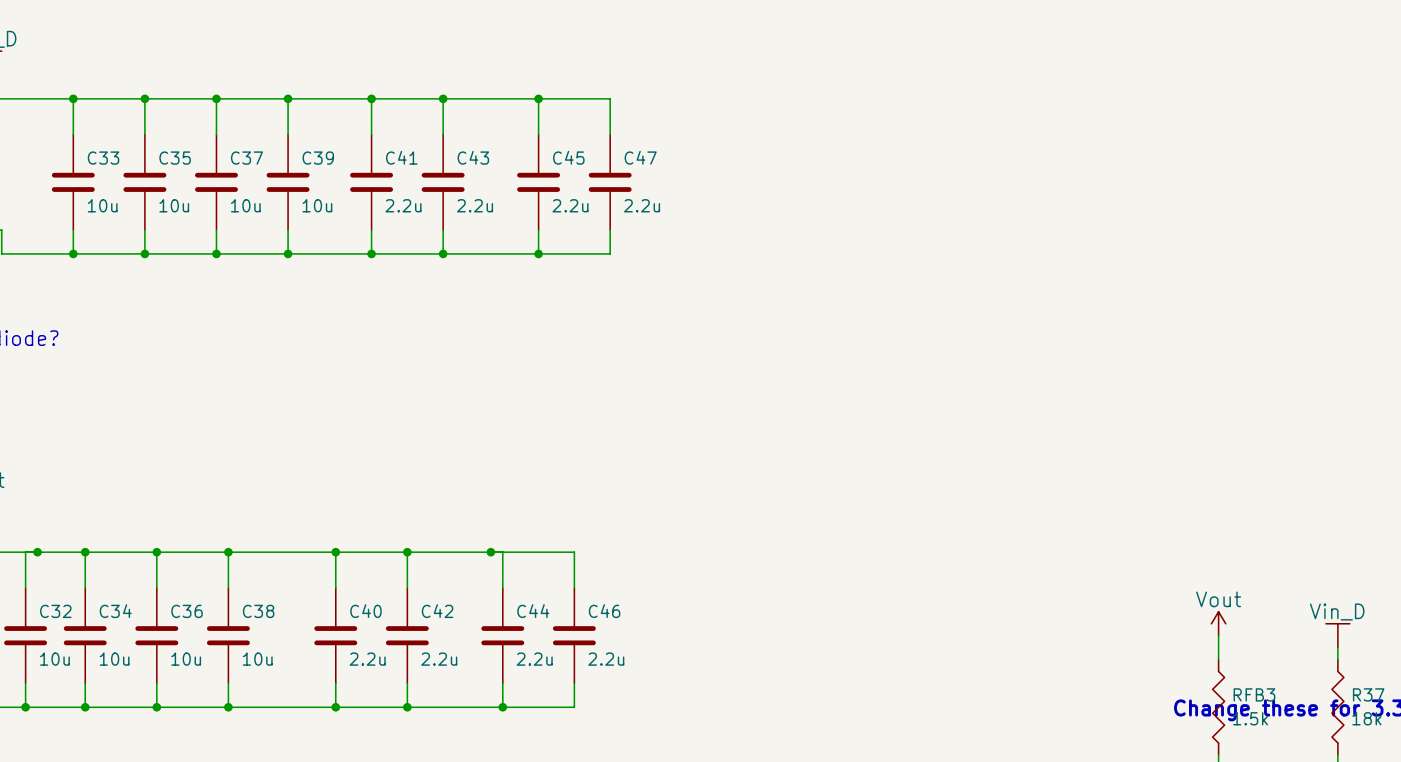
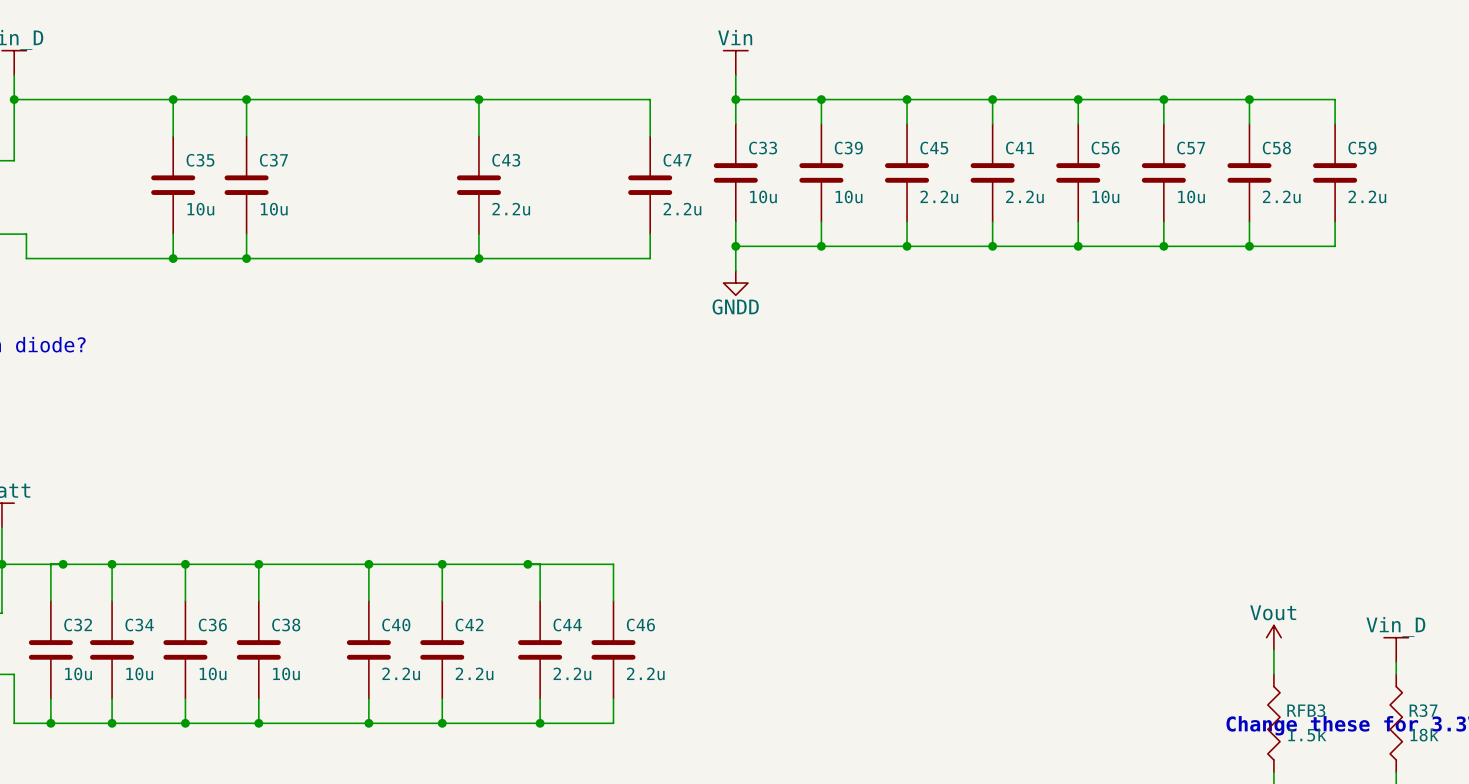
power symbol: none -> Vin (735, 62)
wire: none -> (735, 75) (735, 124)
wire: (73, 98) (73, 134) -> none
junction: (73, 98) -> none
wire: (288, 98) (288, 134) -> none
junction: (288, 98) -> none
wire: (371, 98) (371, 134) -> none
junction: (371, 98) -> none
wire: (538, 98) (538, 134) -> none
junction: (538, 98) -> none
wire: none -> (735, 99) (1335, 99) (1335, 124)
junction: none -> (735, 99)
wire: none -> (821, 99) (821, 124)
junction: none -> (821, 99)
wire: none -> (907, 99) (907, 124)
junction: none -> (907, 99)
wire: none -> (992, 99) (992, 124)
junction: none -> (992, 99)
wire: none -> (1078, 99) (1078, 124)
junction: none -> (1078, 99)
wire: none -> (1163, 99) (1163, 124)
junction: none -> (1163, 99)
wire: none -> (1249, 99) (1249, 124)
junction: none -> (1249, 99)
C56: none -> 10u (1078, 172)
C57: none -> 10u (1163, 172)
C58: none -> 2.2u (1249, 172)
C59: none -> 2.2u (1335, 172)
C33 position: (73, 182) -> (735, 172)
C39 position: (288, 182) -> (821, 172)
C41 position: (371, 182) -> (992, 172)
C45 position: (538, 182) -> (907, 172)
wire: none -> (735, 221) (735, 270)
wire: none -> (821, 221) (821, 246)
wire: none -> (907, 221) (907, 246)
wire: none -> (992, 221) (992, 246)
wire: none -> (1078, 221) (1078, 246)
wire: none -> (1163, 221) (1163, 246)
wire: none -> (1249, 221) (1249, 246)
wire: none -> (1335, 221) (1335, 246) (735, 246)
wire: (73, 230) (73, 253) -> none
wire: (288, 230) (288, 253) -> none
wire: (371, 230) (371, 253) -> none
wire: (538, 230) (538, 253) -> none
junction: none -> (735, 246)
junction: none -> (821, 246)
junction: none -> (907, 246)
junction: none -> (992, 246)
junction: none -> (1078, 246)
junction: none -> (1163, 246)
junction: none -> (1249, 246)
junction: (73, 253) -> none
junction: (288, 253) -> none
junction: (371, 253) -> none
junction: (538, 253) -> none
power symbol: none -> GNDD (735, 283)

